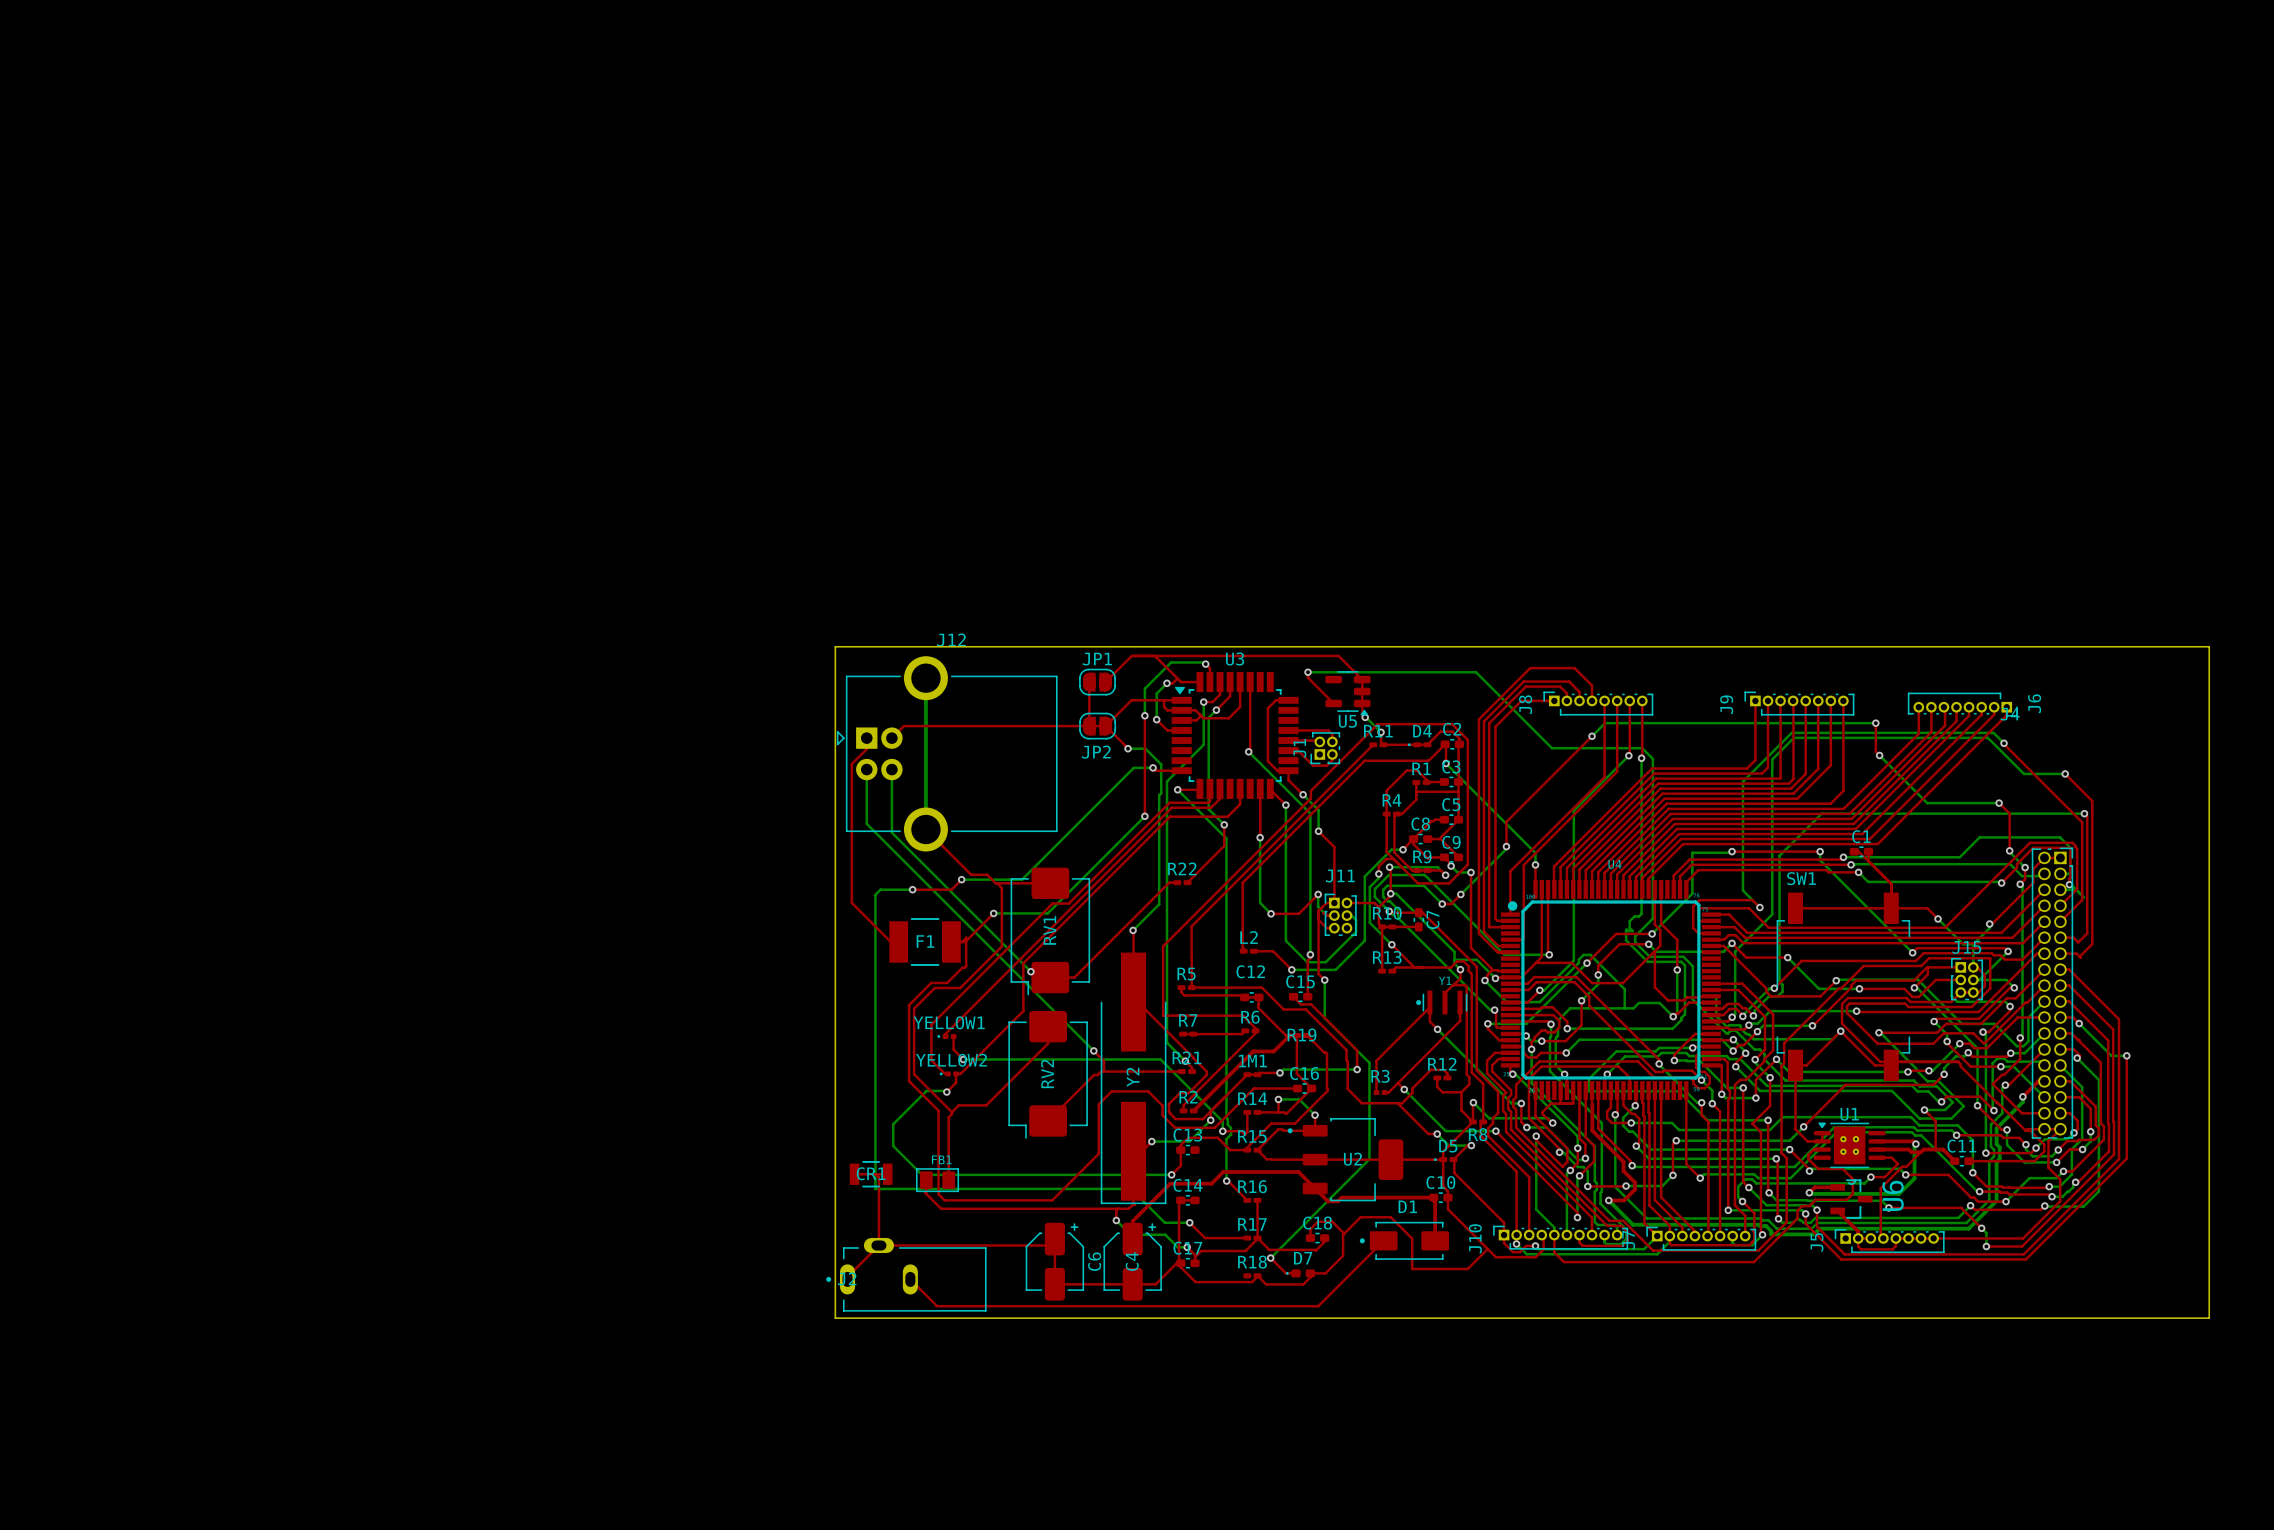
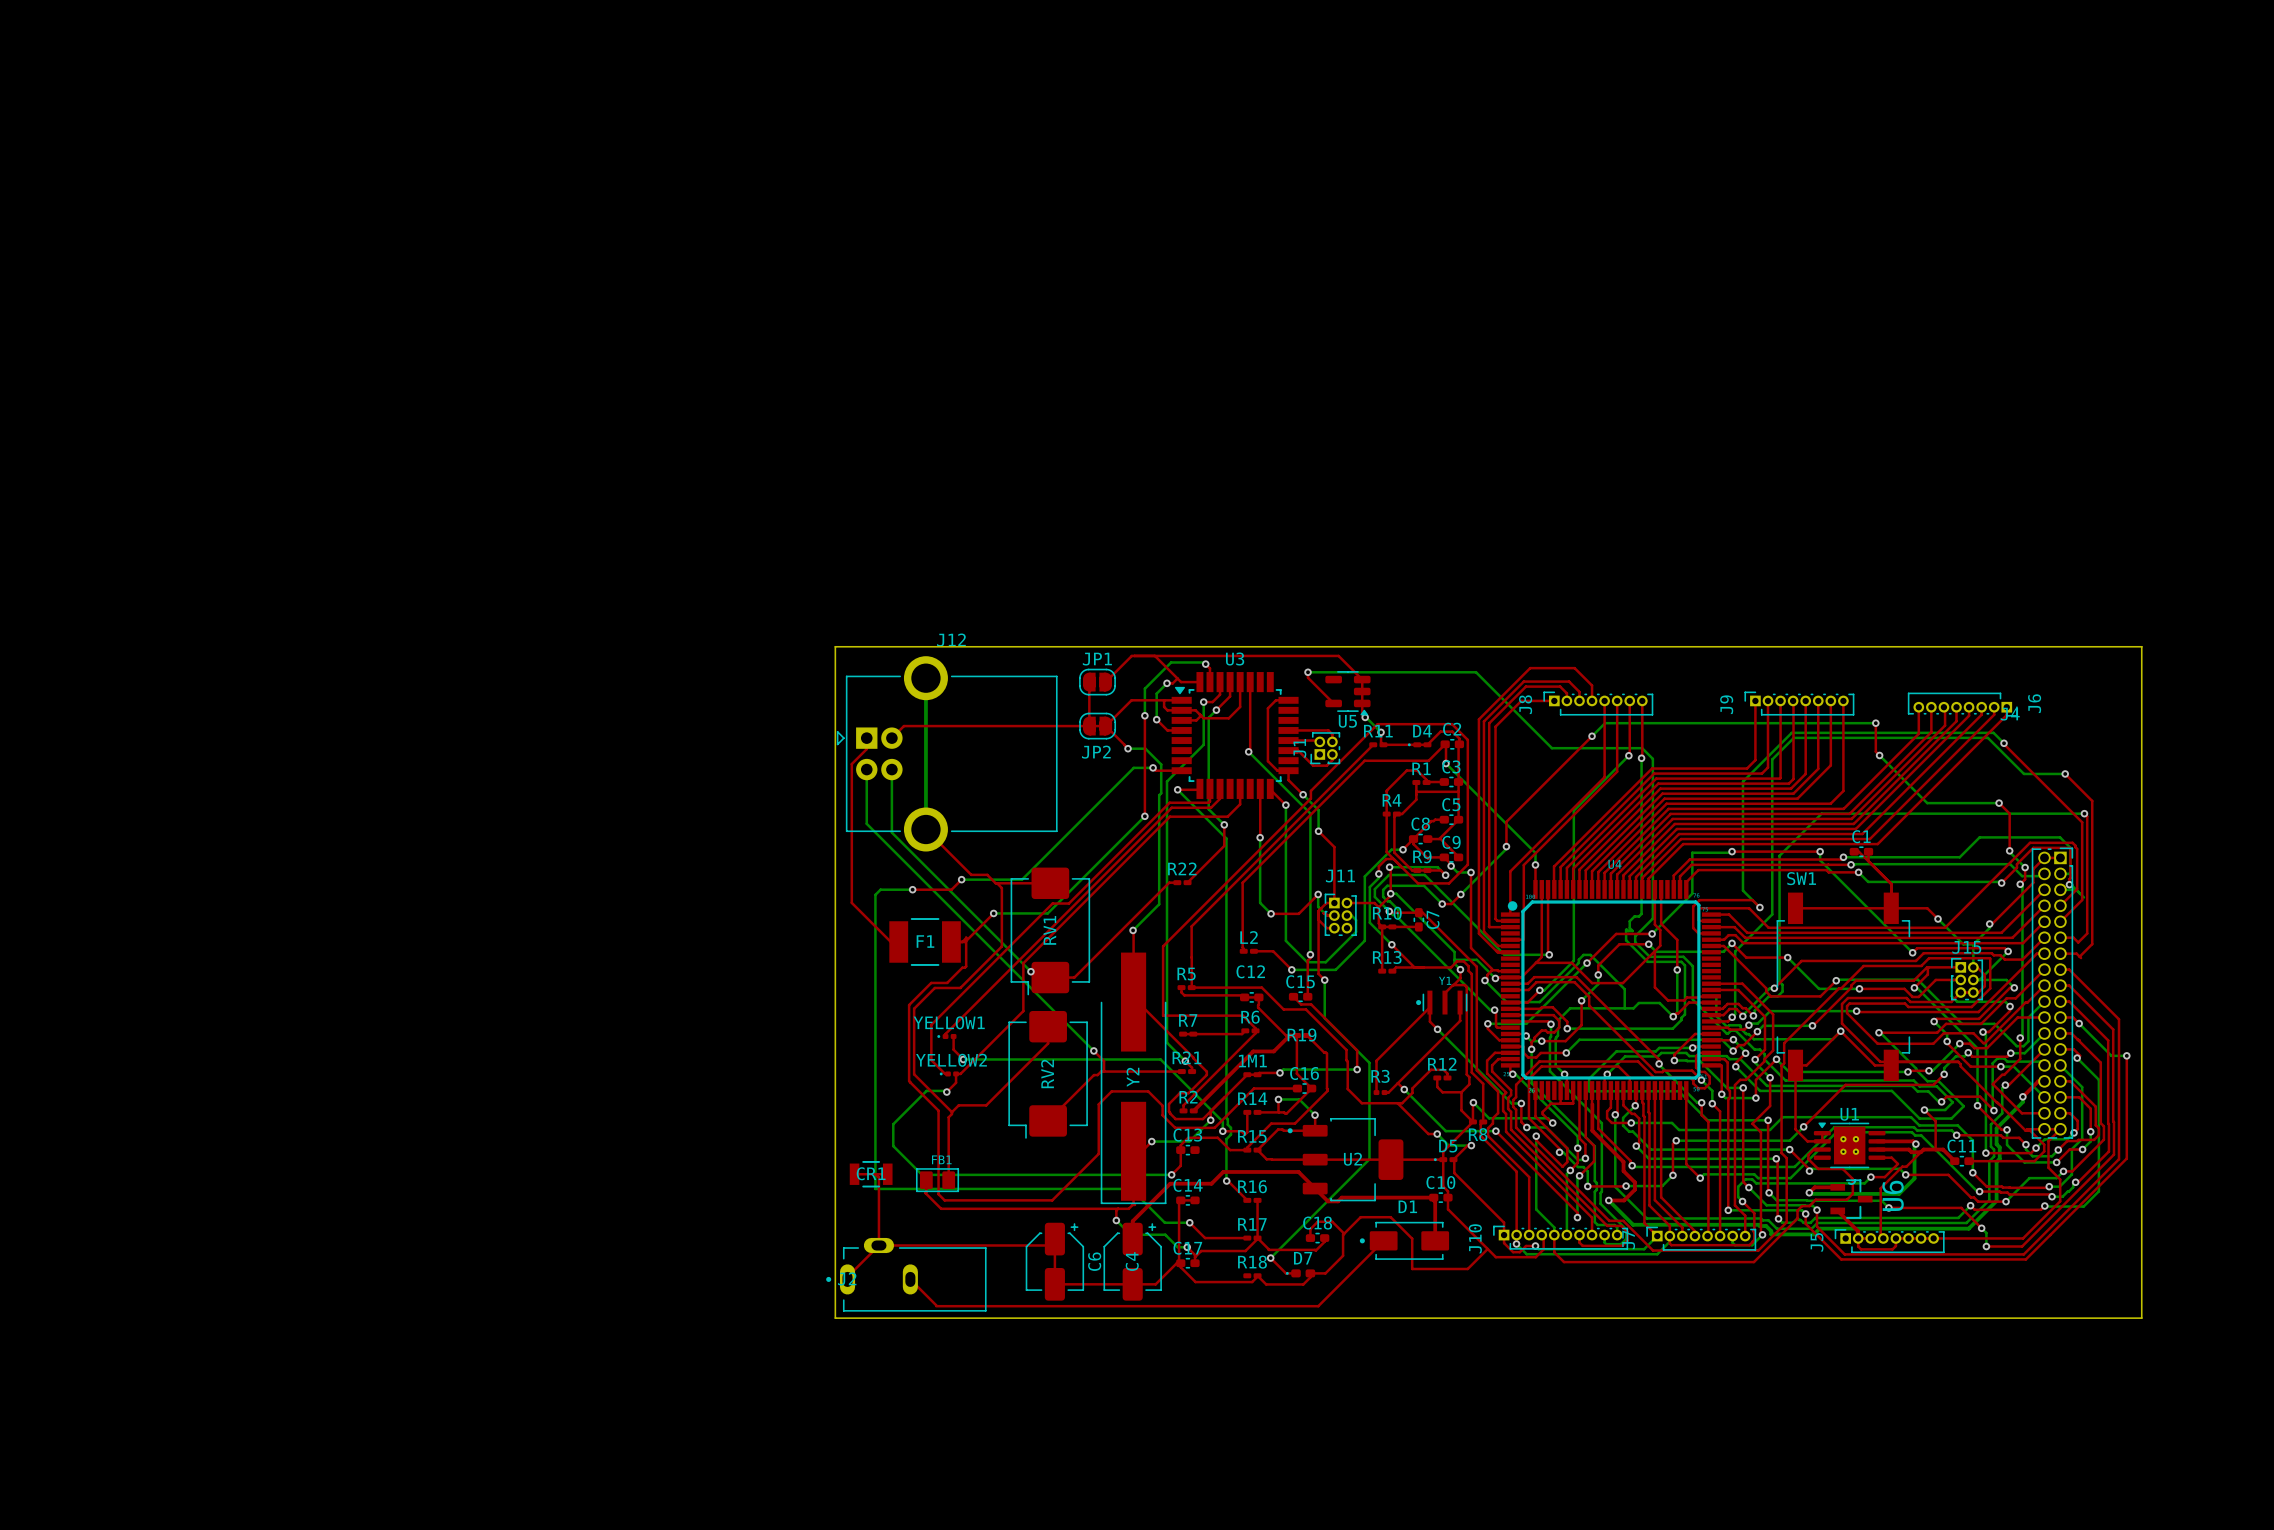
board edge: (2141, 646) (2209, 646) (2209, 1318) (2141, 1318) -> (2141, 646) (2141, 1318)

